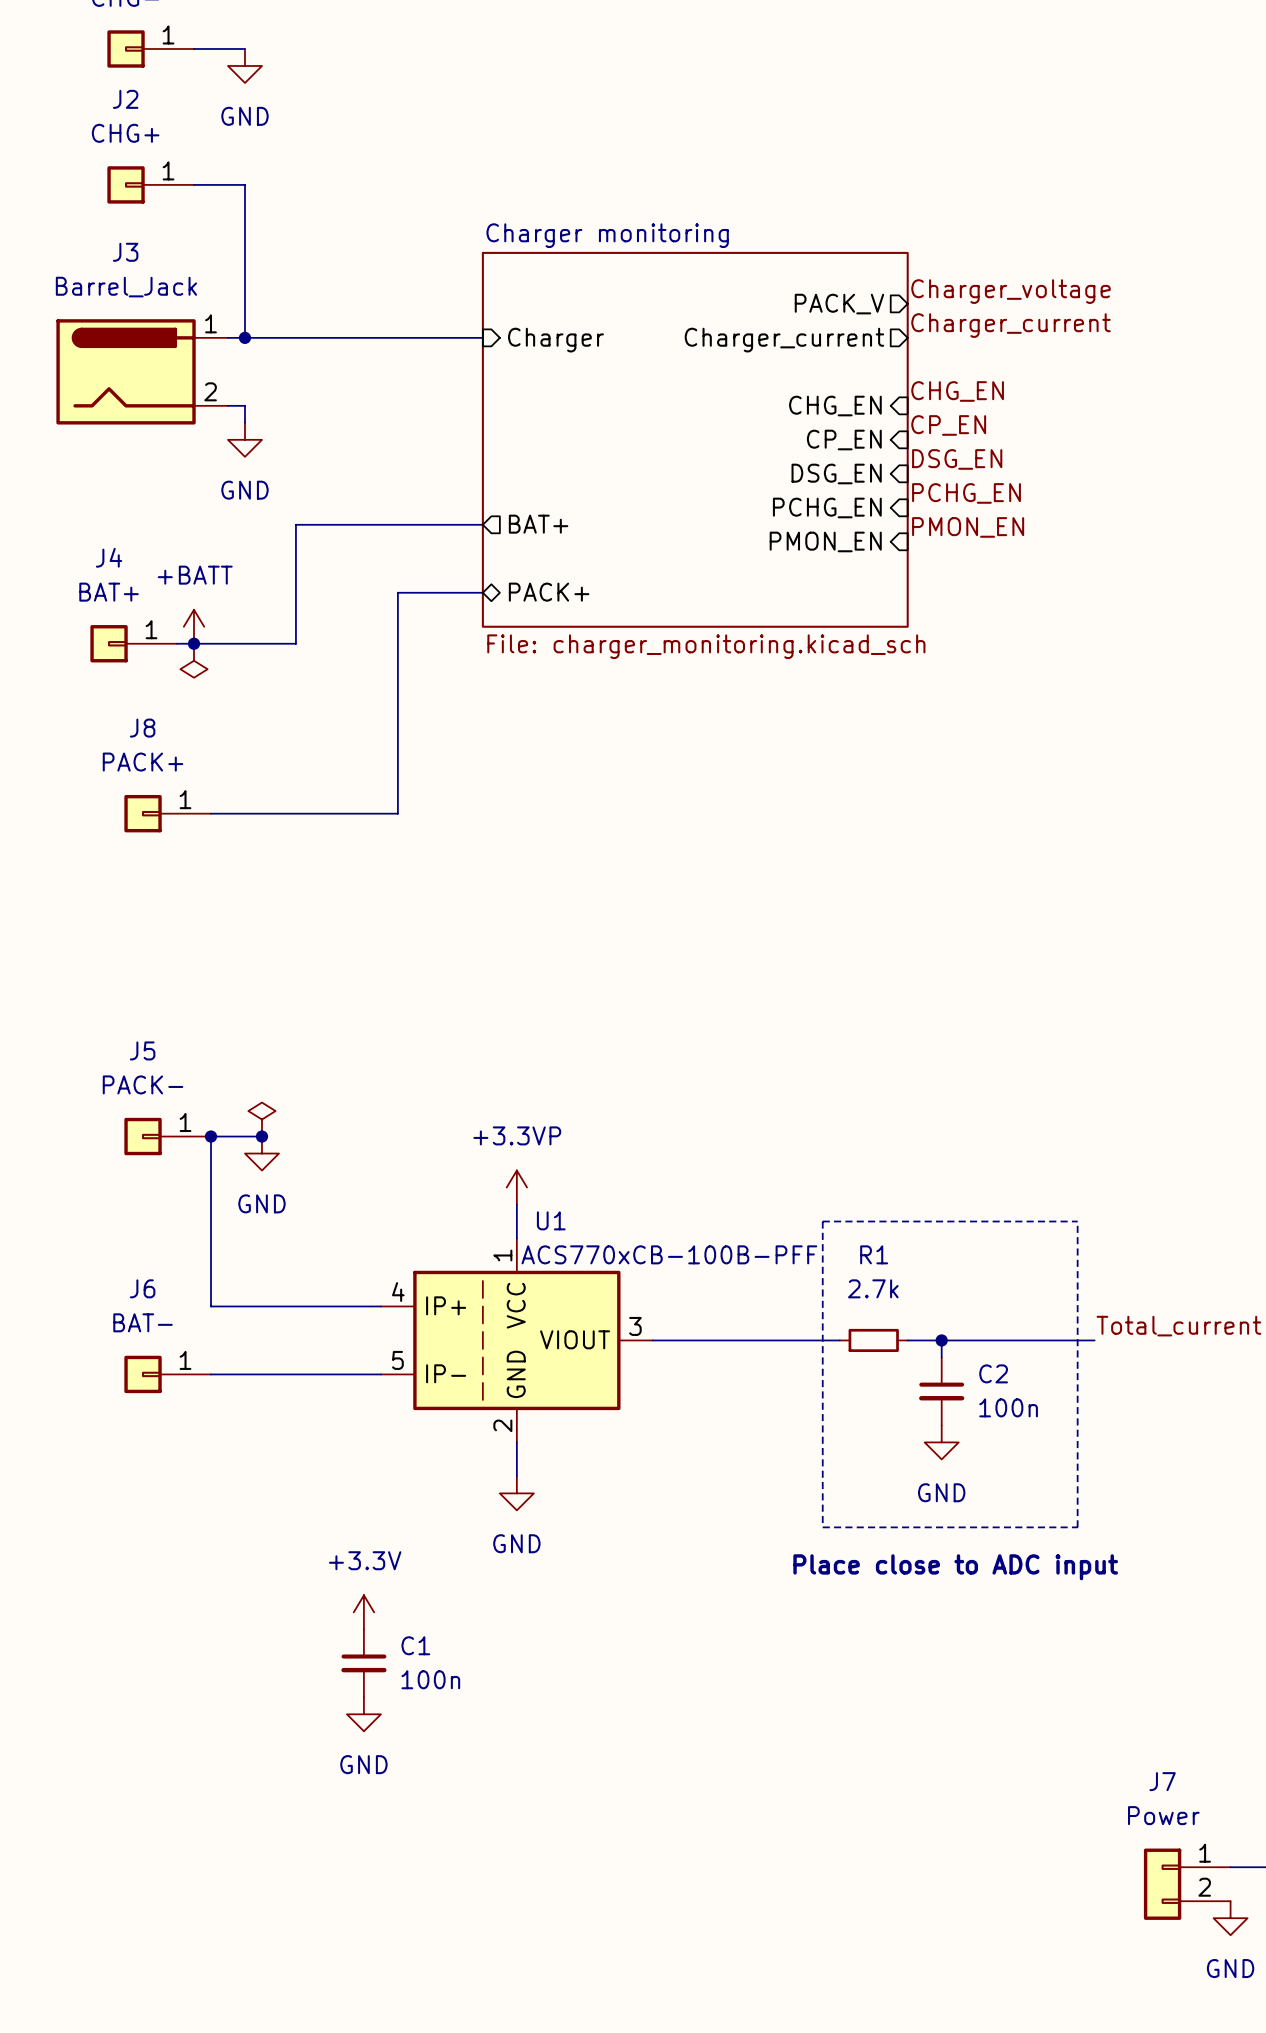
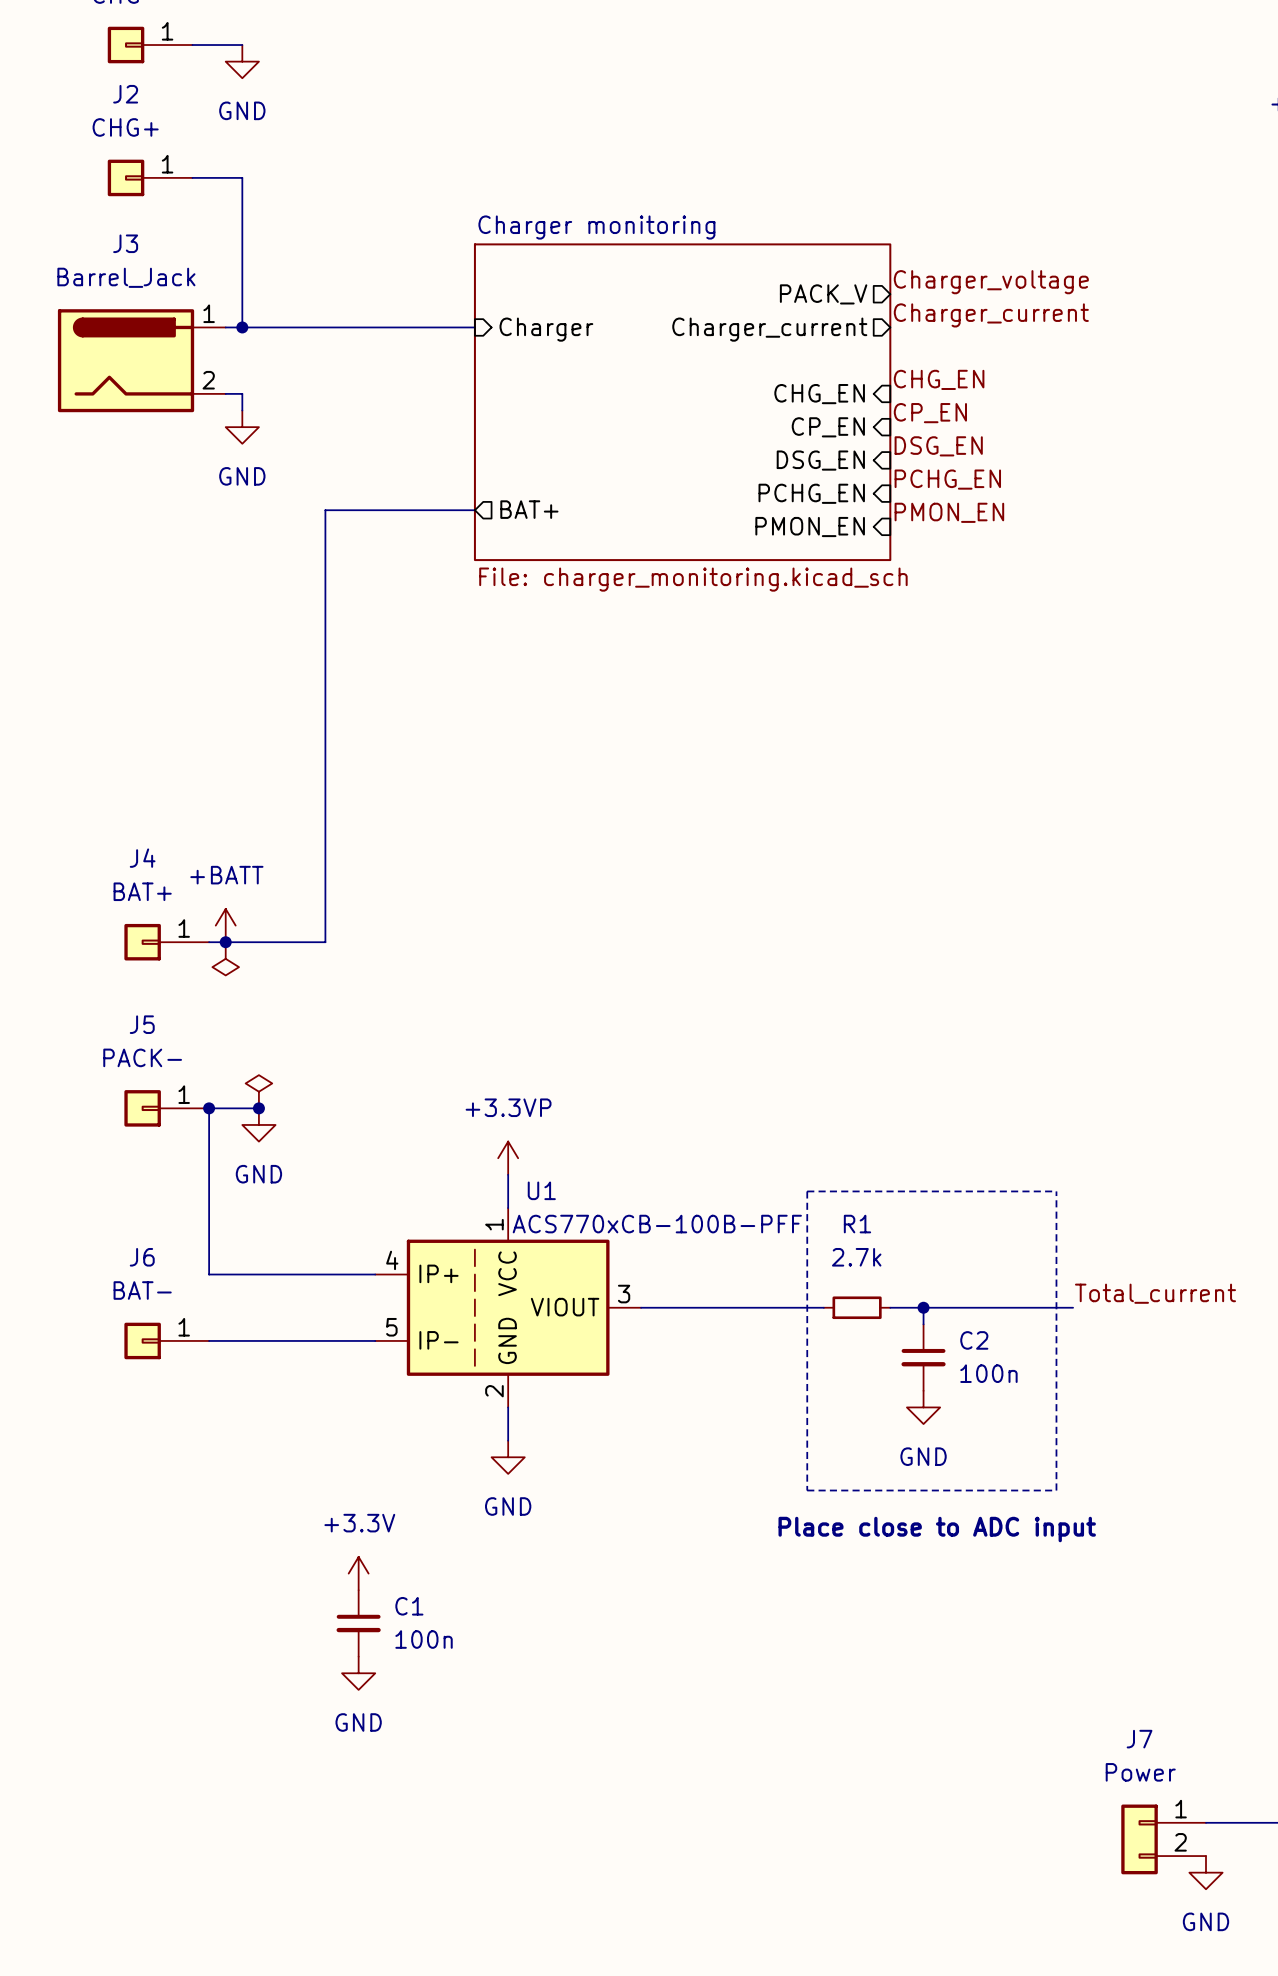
sheet Charger monitoring: none -> File: charger_monitoring.kicad_sch (682, 402)
sheet Charger monitoring: File: charger_monitoring.kicad_sch (695, 439) -> none
wire: (329, 524) (295, 524) (295, 643) (177, 643) -> (325, 510) (325, 942) (209, 942)
wire: (482, 592) (397, 592) (397, 813) (211, 813) -> none
sheet pin: PACK+ (549, 592) -> none
power symbol position: +BATT (194, 626) -> +BATT (225, 925)
J4 position: (133, 643) -> (166, 942)
junction: (194, 643) -> none
power symbol position: (194, 660) -> (225, 958)
J8: PACK+ (167, 813) -> none
junction: none -> (225, 942)

